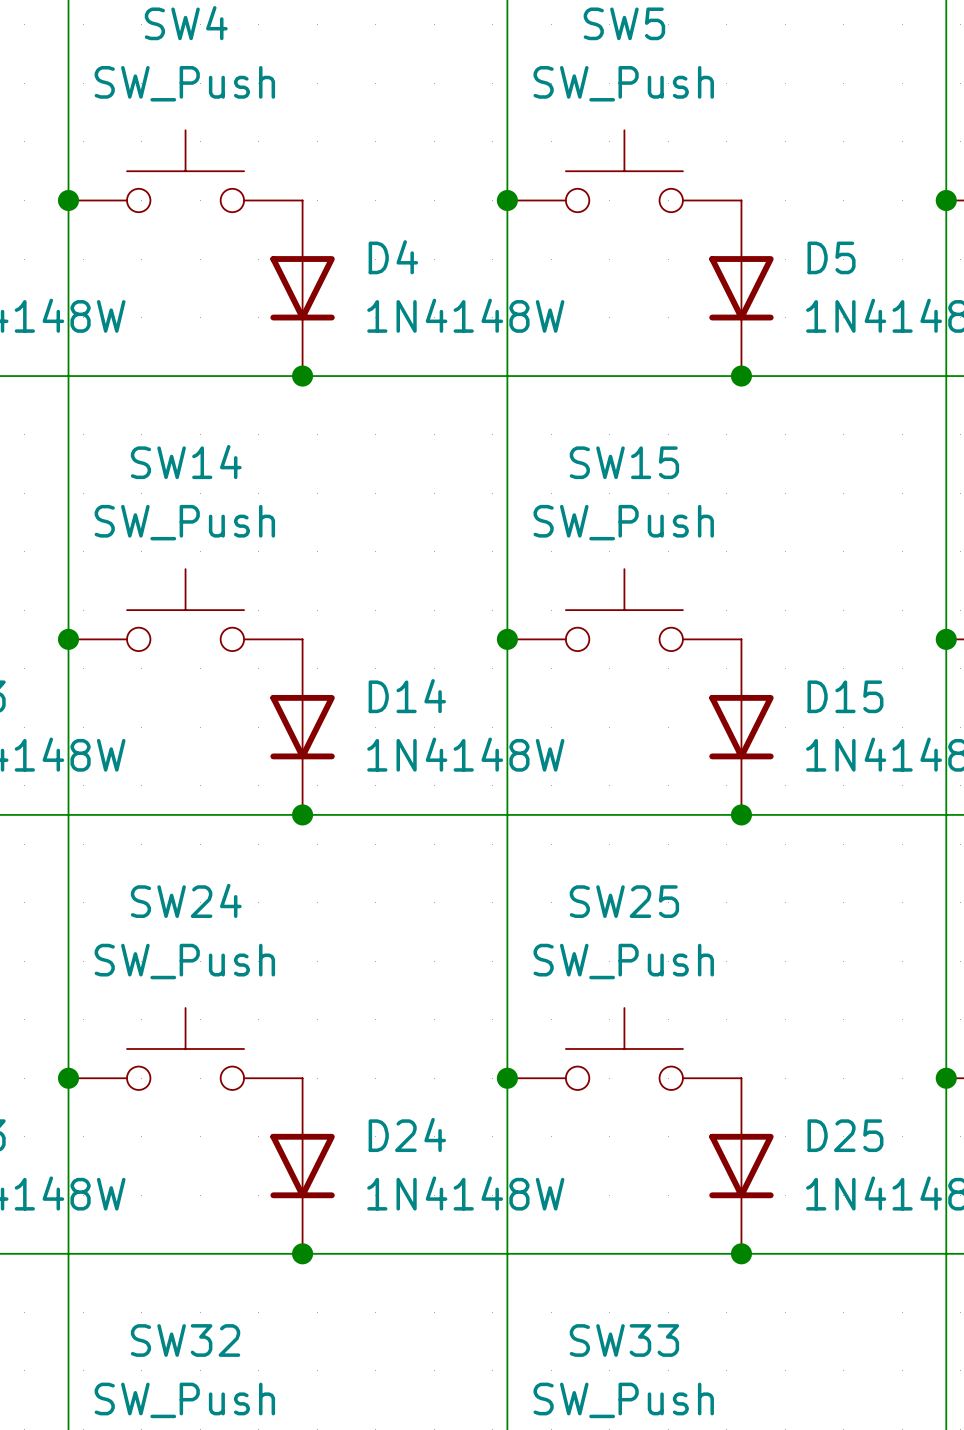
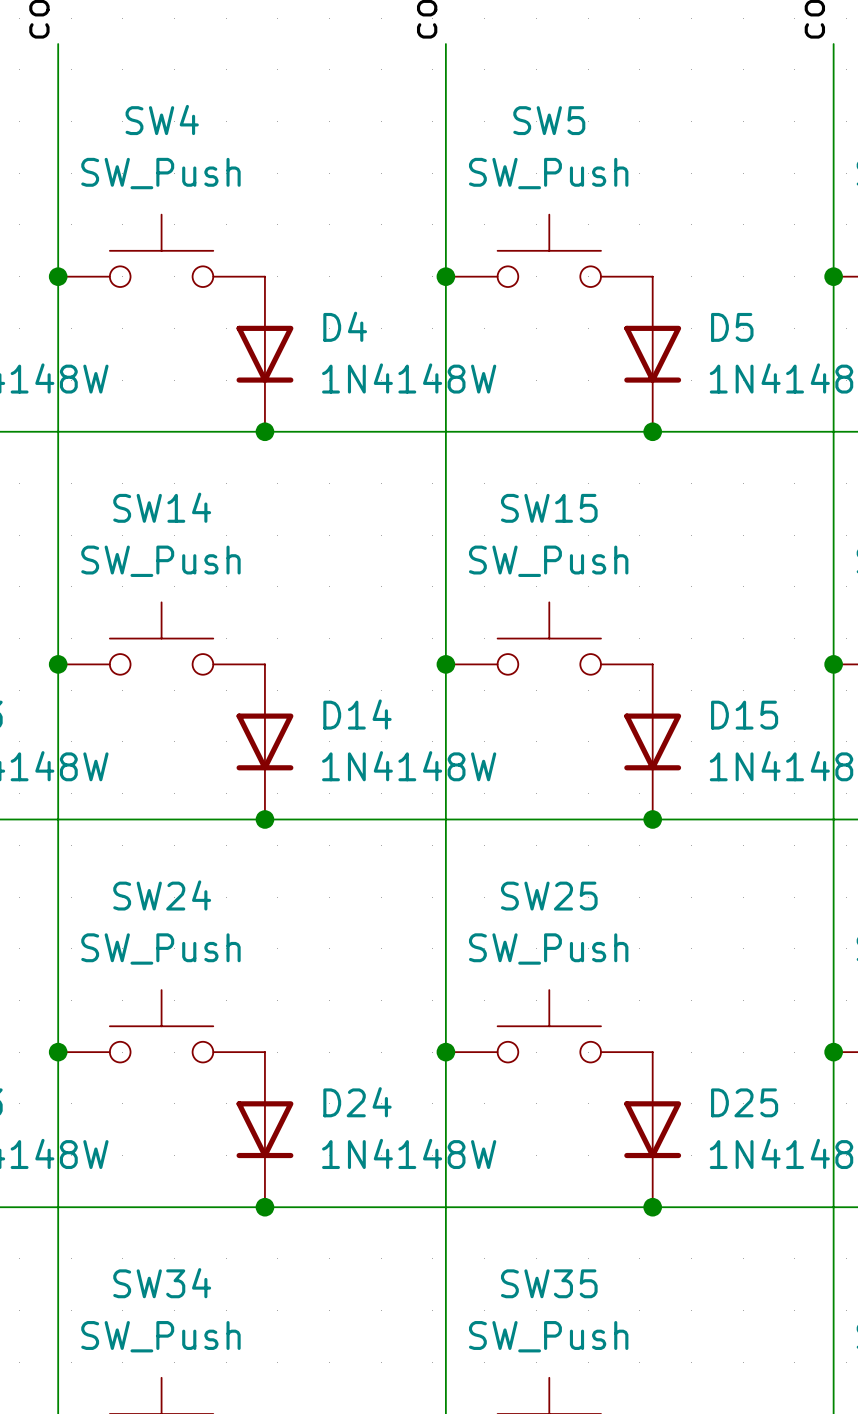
SW32 name: SW32 (185, 1340) -> SW34 (162, 1283)
SW33 name: SW33 (624, 1340) -> SW35 (549, 1283)

